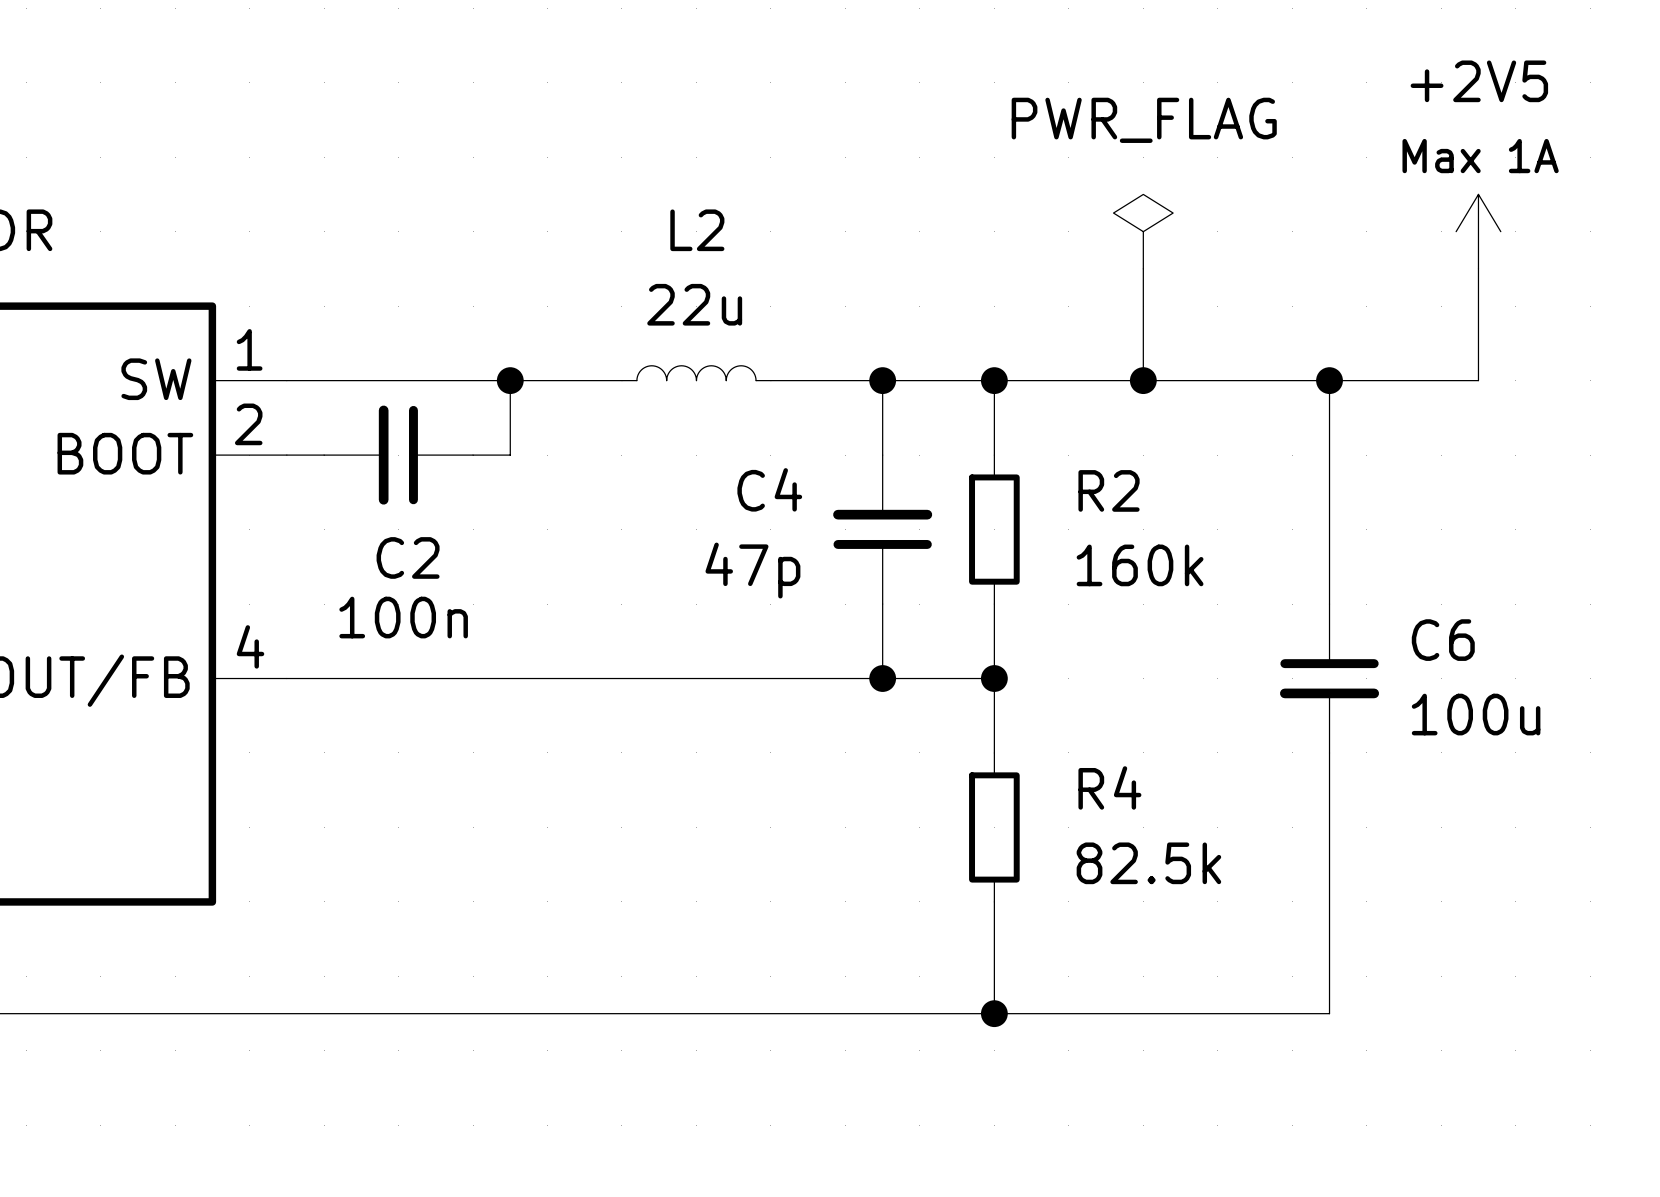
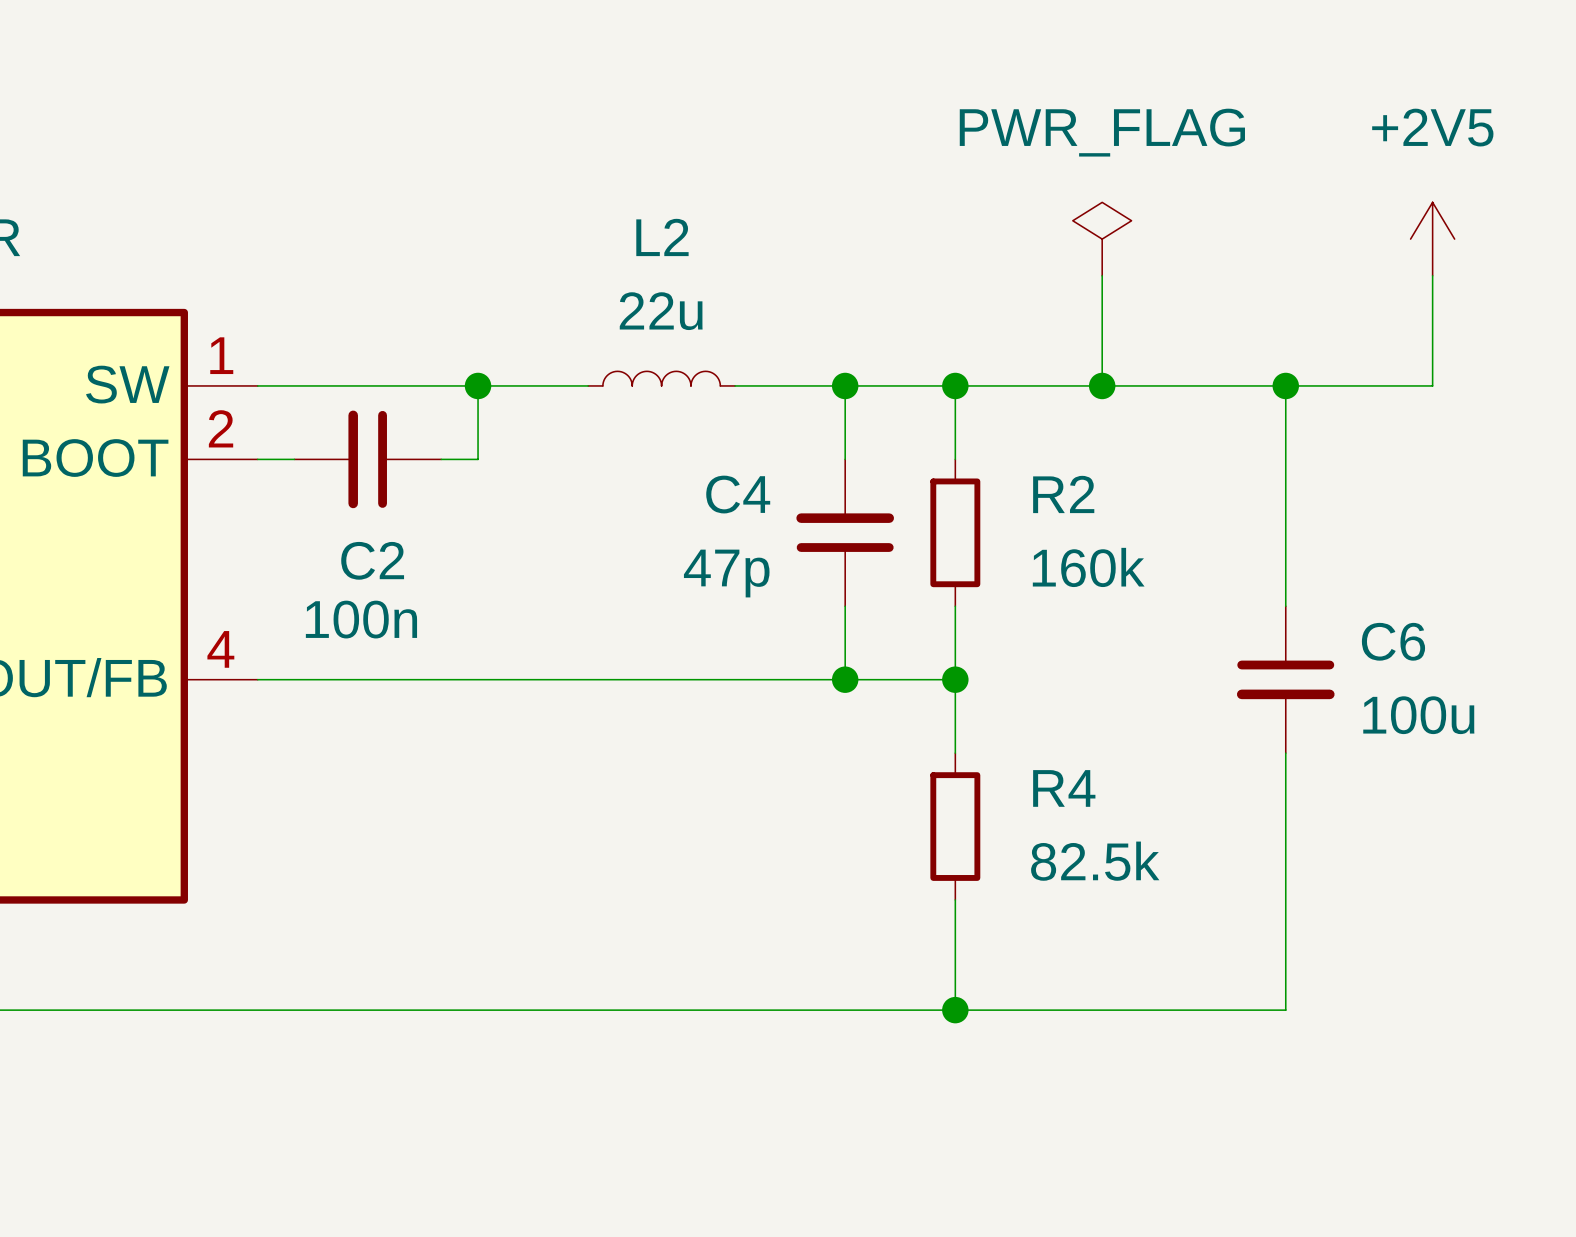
power symbol text position: +2V5 (1479, 81) -> +2V5 (1432, 127)
power symbol text: Max 1A (1480, 156) -> none

